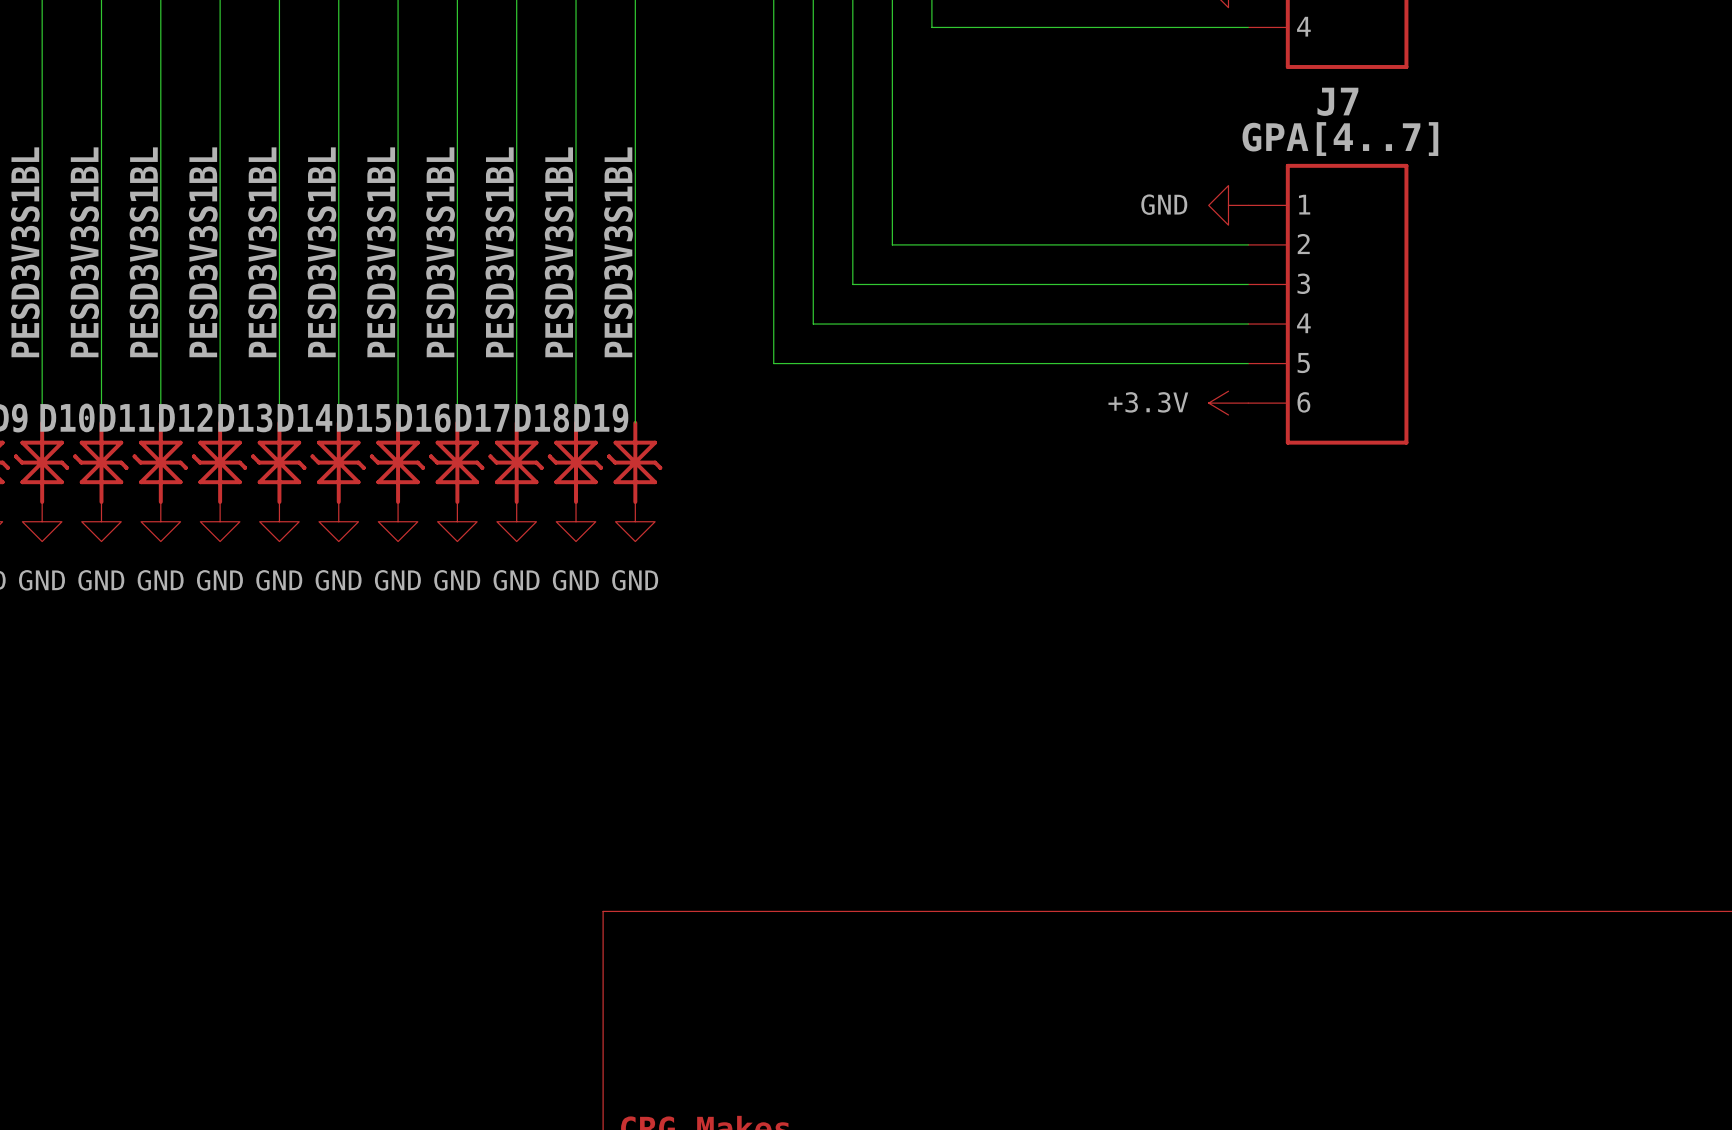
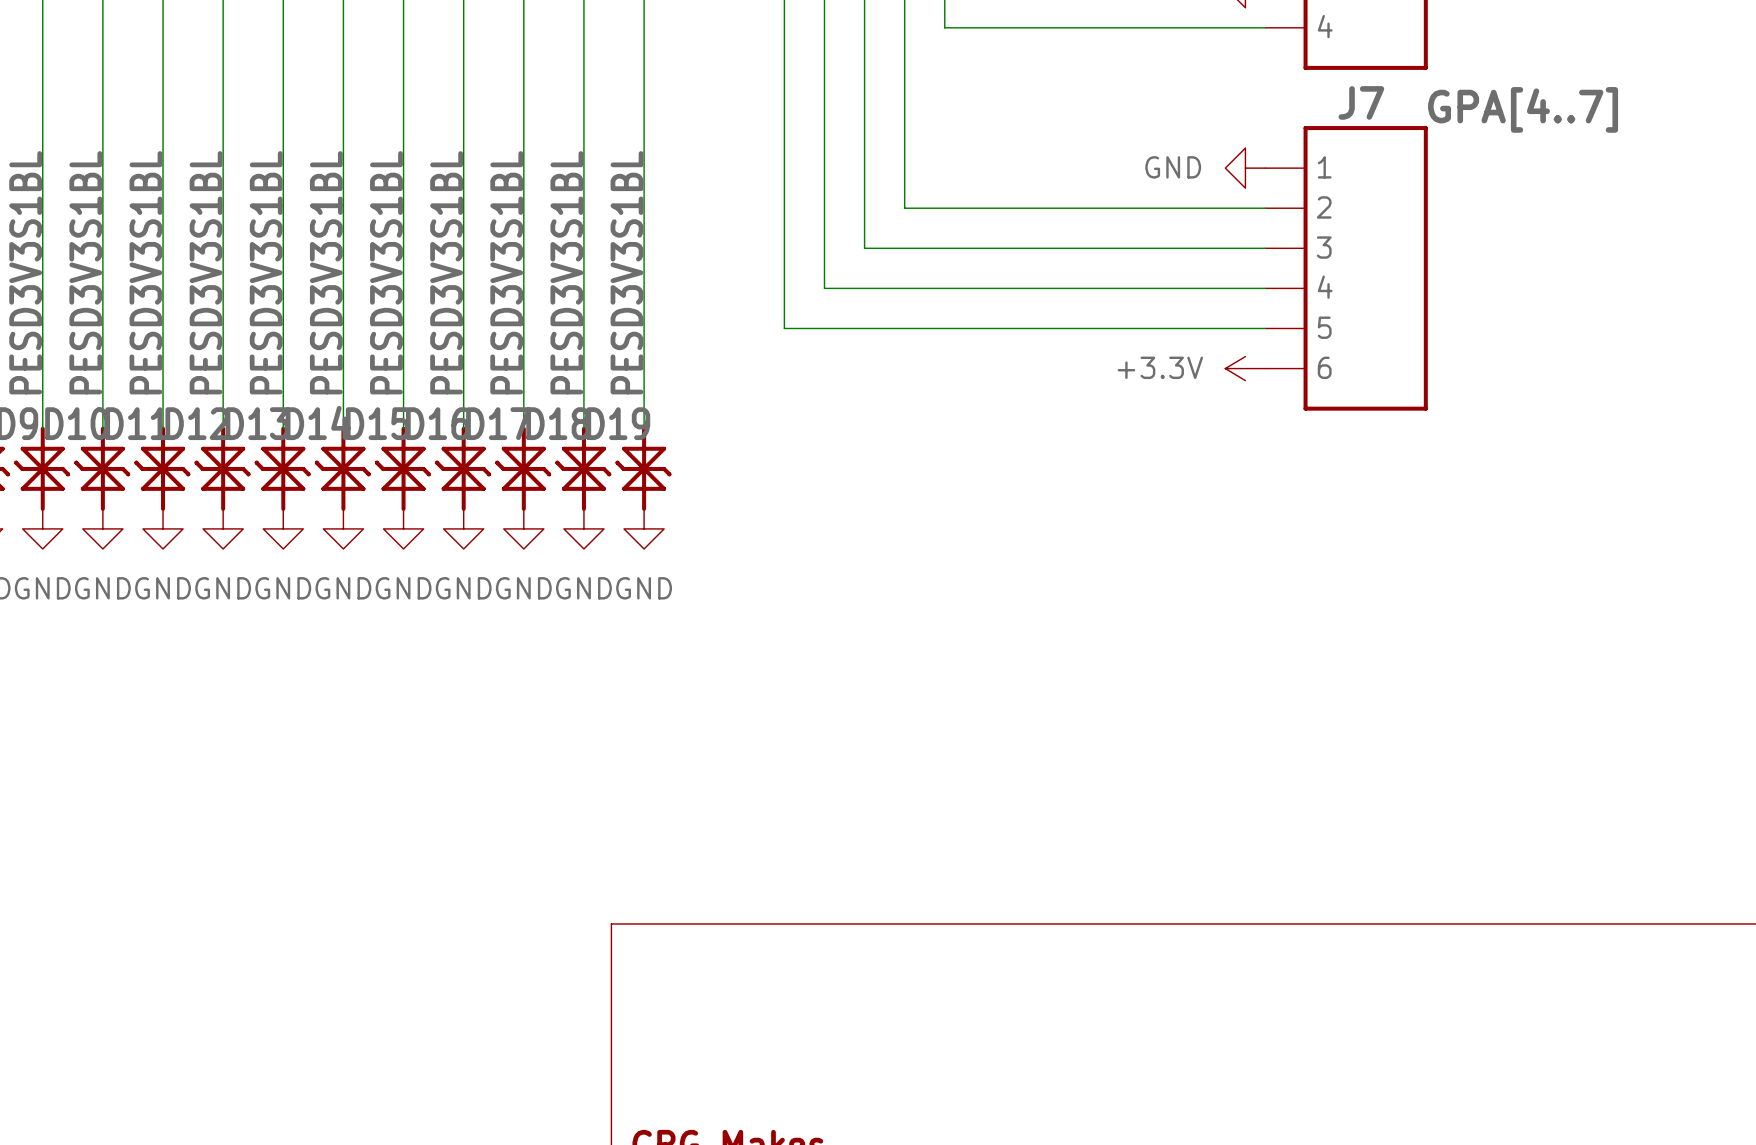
J7 value position: GPA[4..7] (1340, 139) -> GPA[4..7] (1523, 109)
wire: (892, 205) (892, 244) -> (864, 248) (904, 248)
wire: none -> (904, 208) (1265, 208)
power symbol position: GND (1228, 205) -> GND (1245, 168)
wire: (852, 244) (852, 284) -> (824, 288) (864, 288)
wire: (813, 284) (813, 324) -> (784, 328) (824, 328)
J7 position: (1328, 304) -> (1346, 268)
wire: (773, 324) (773, 363) (1248, 363) -> none
power symbol position: +3.3V (1228, 403) -> +3.3V (1245, 368)

